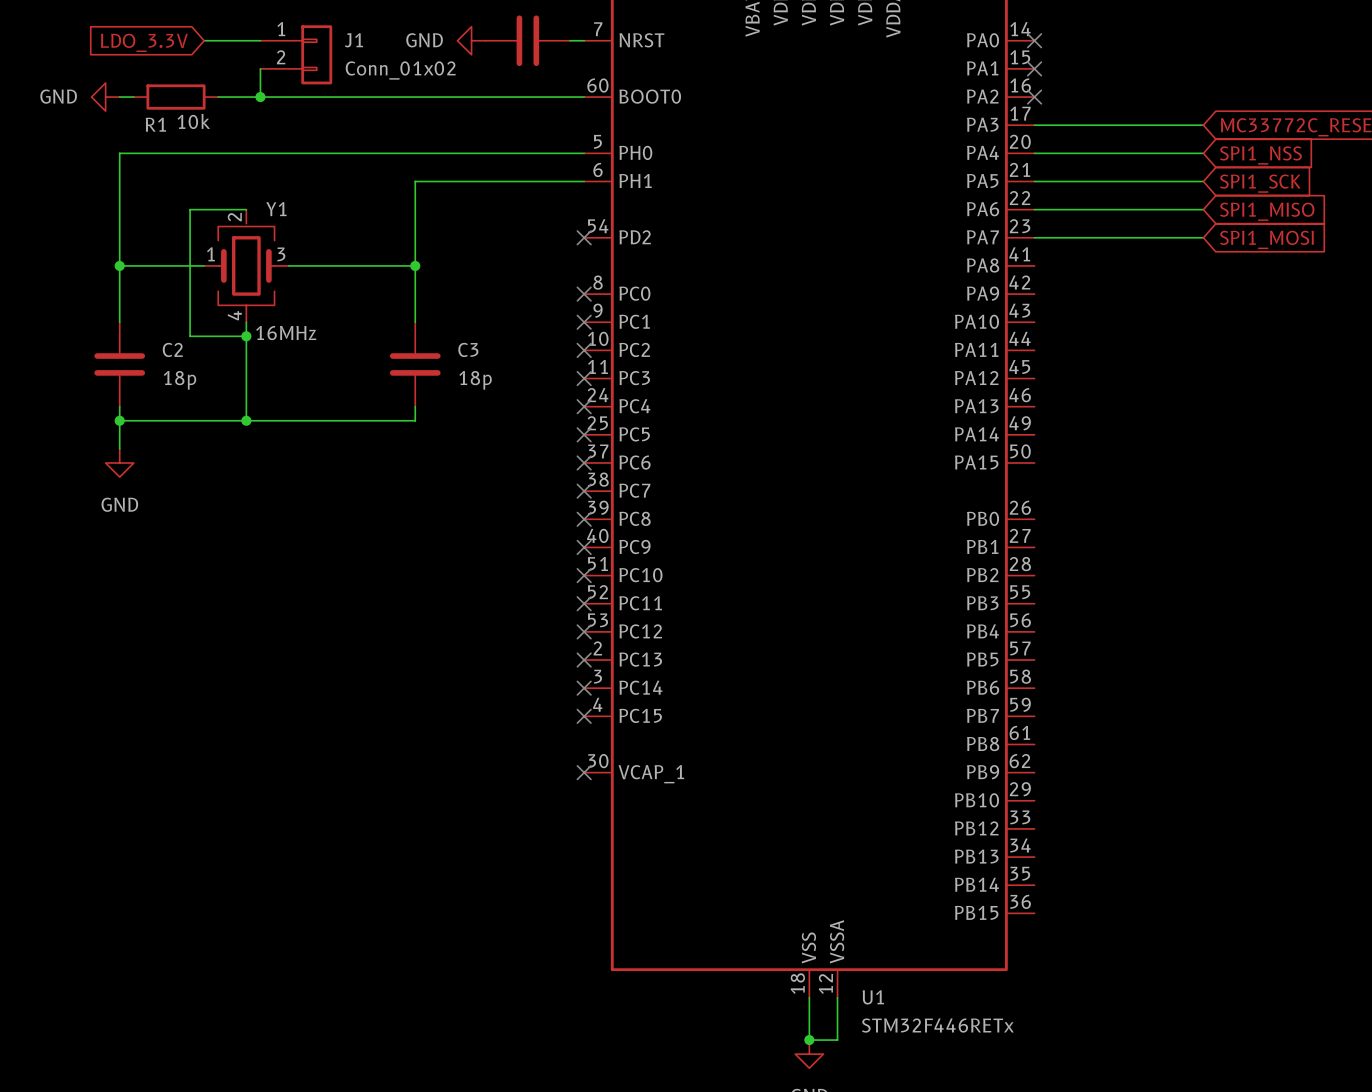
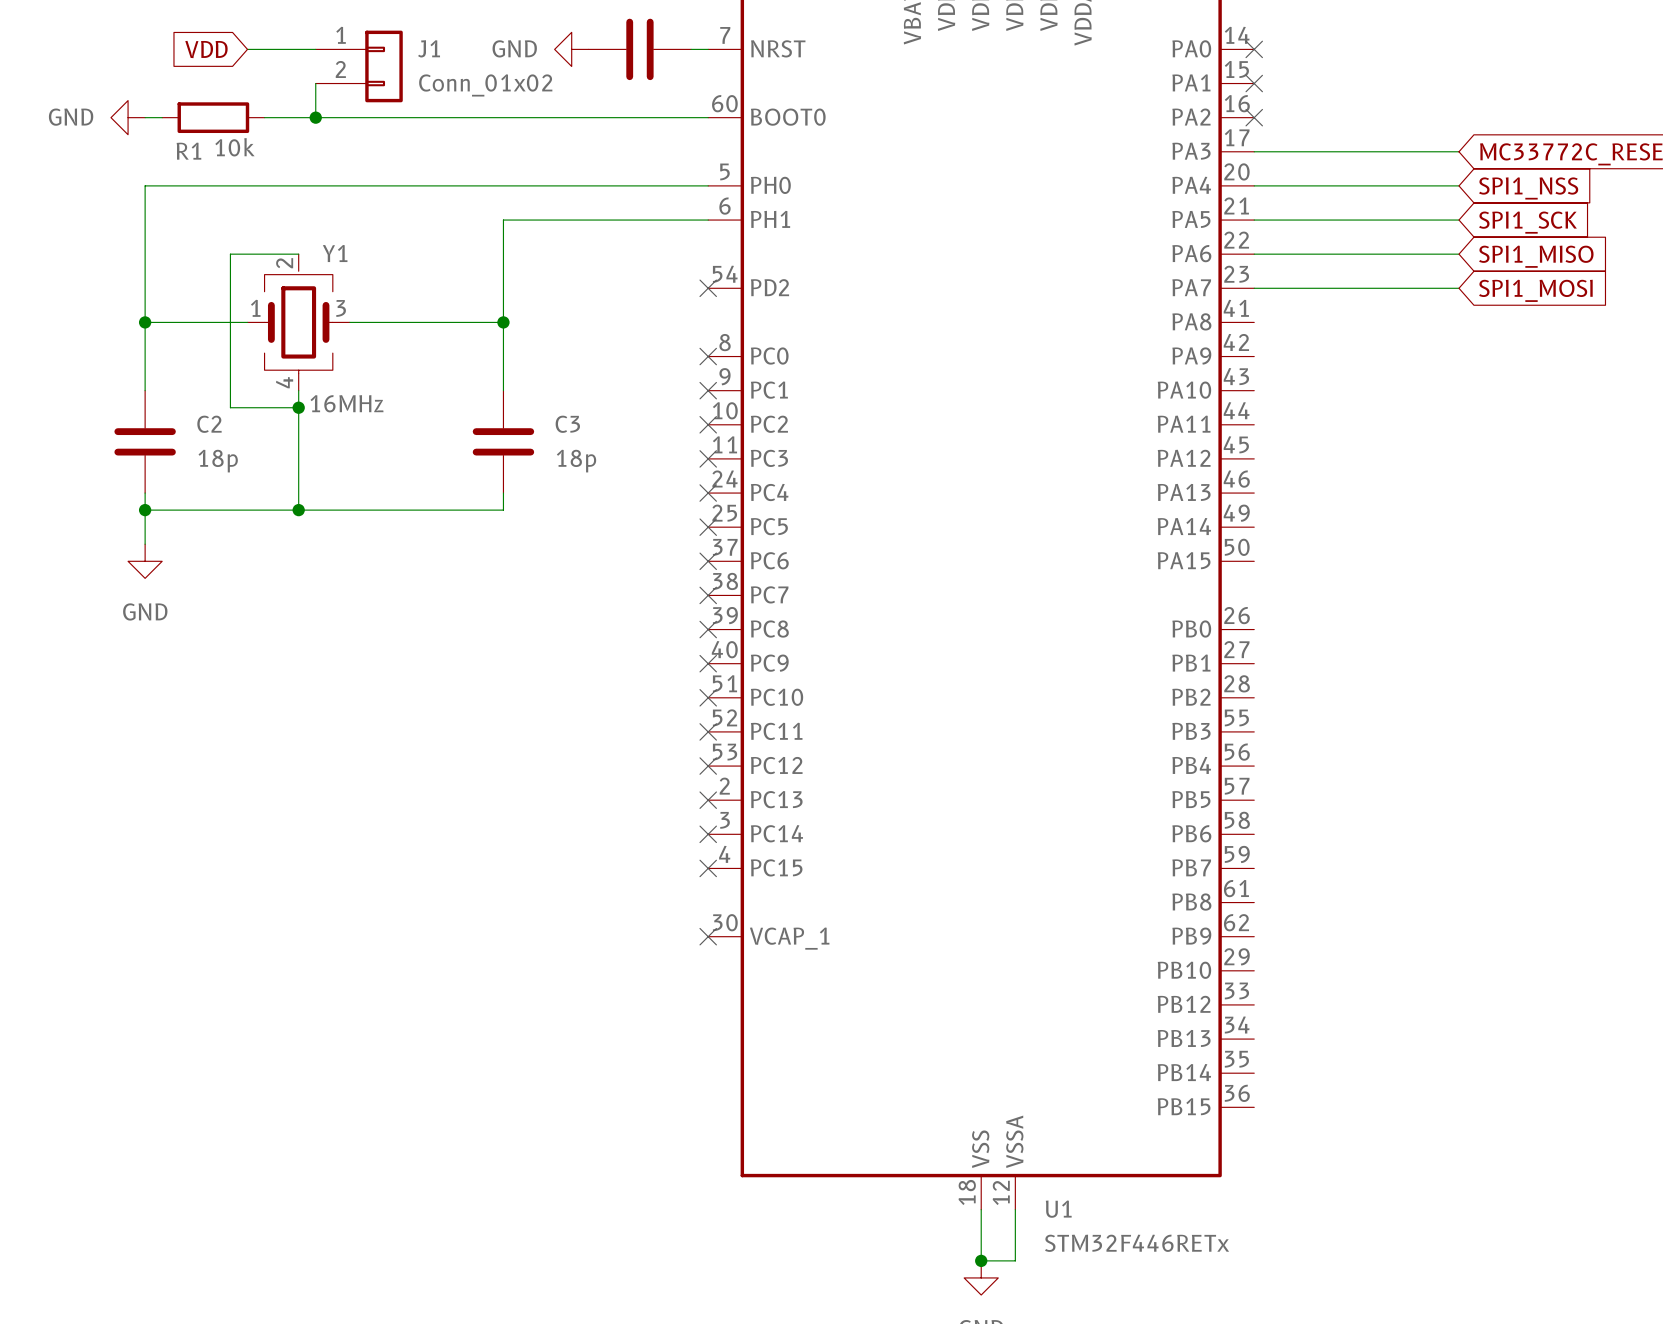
global label: LDO_3.3V (144, 42) -> VDD (206, 49)

